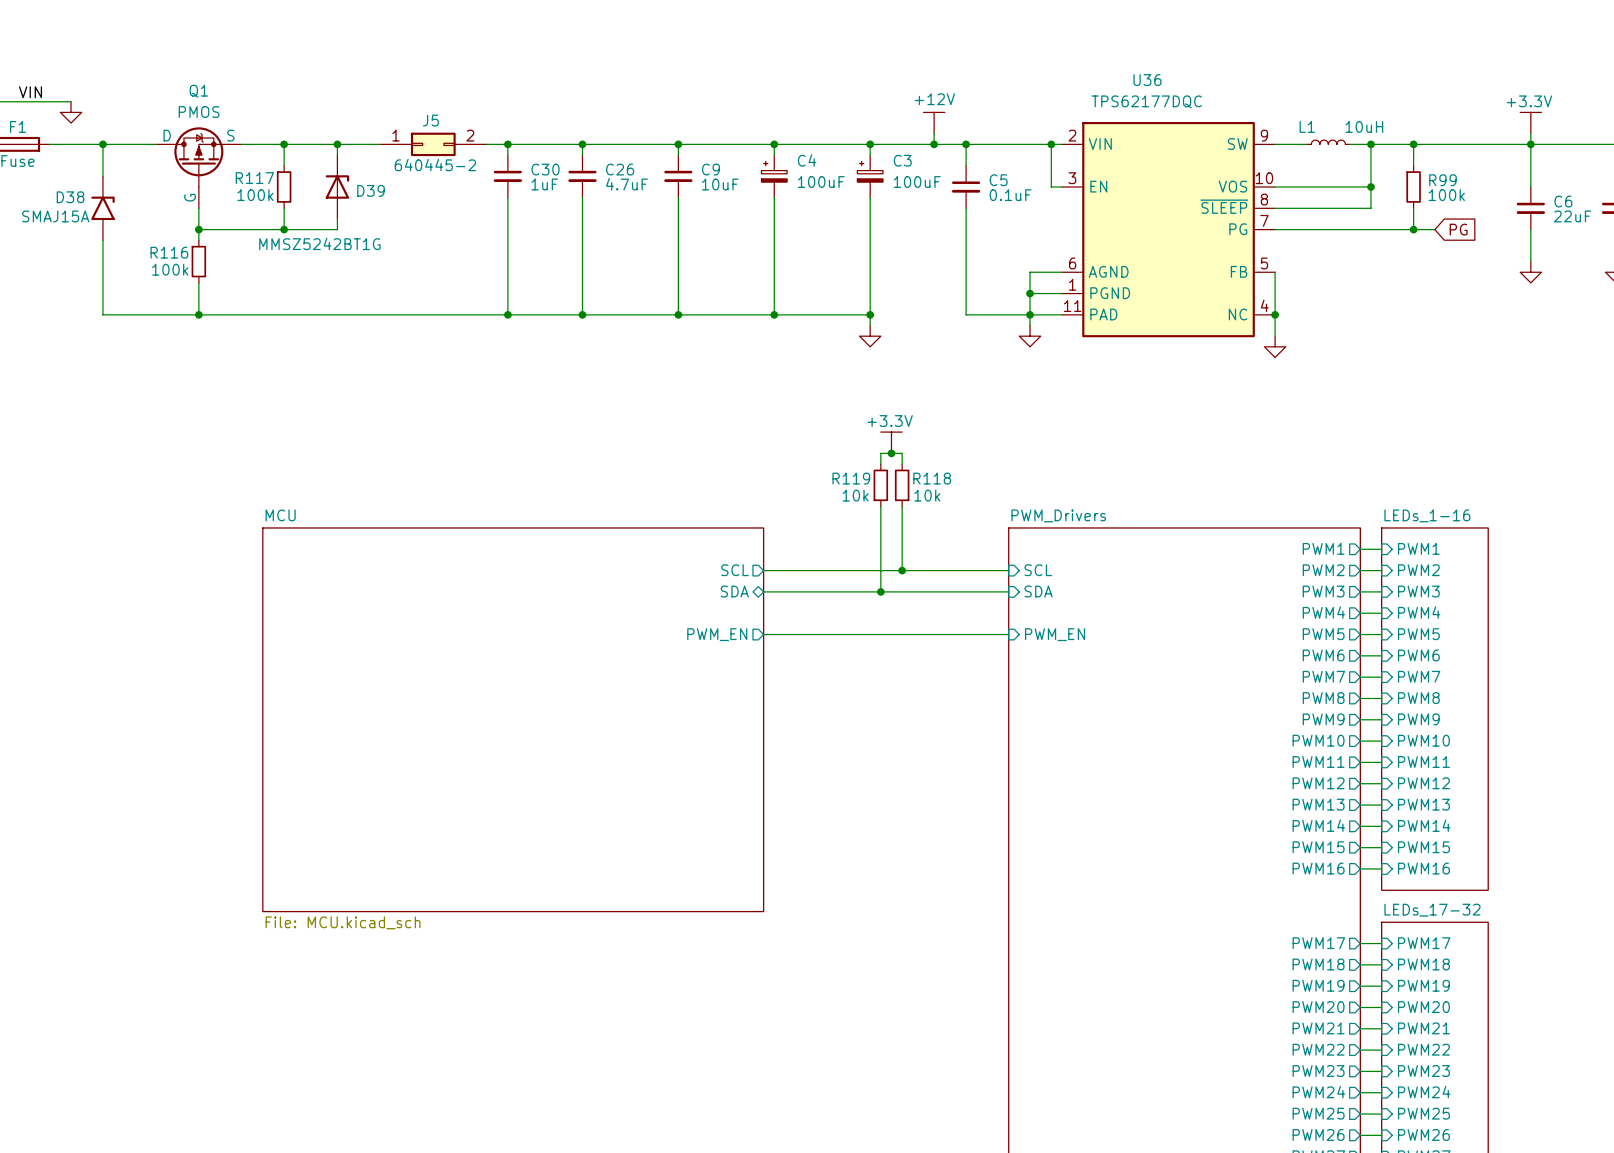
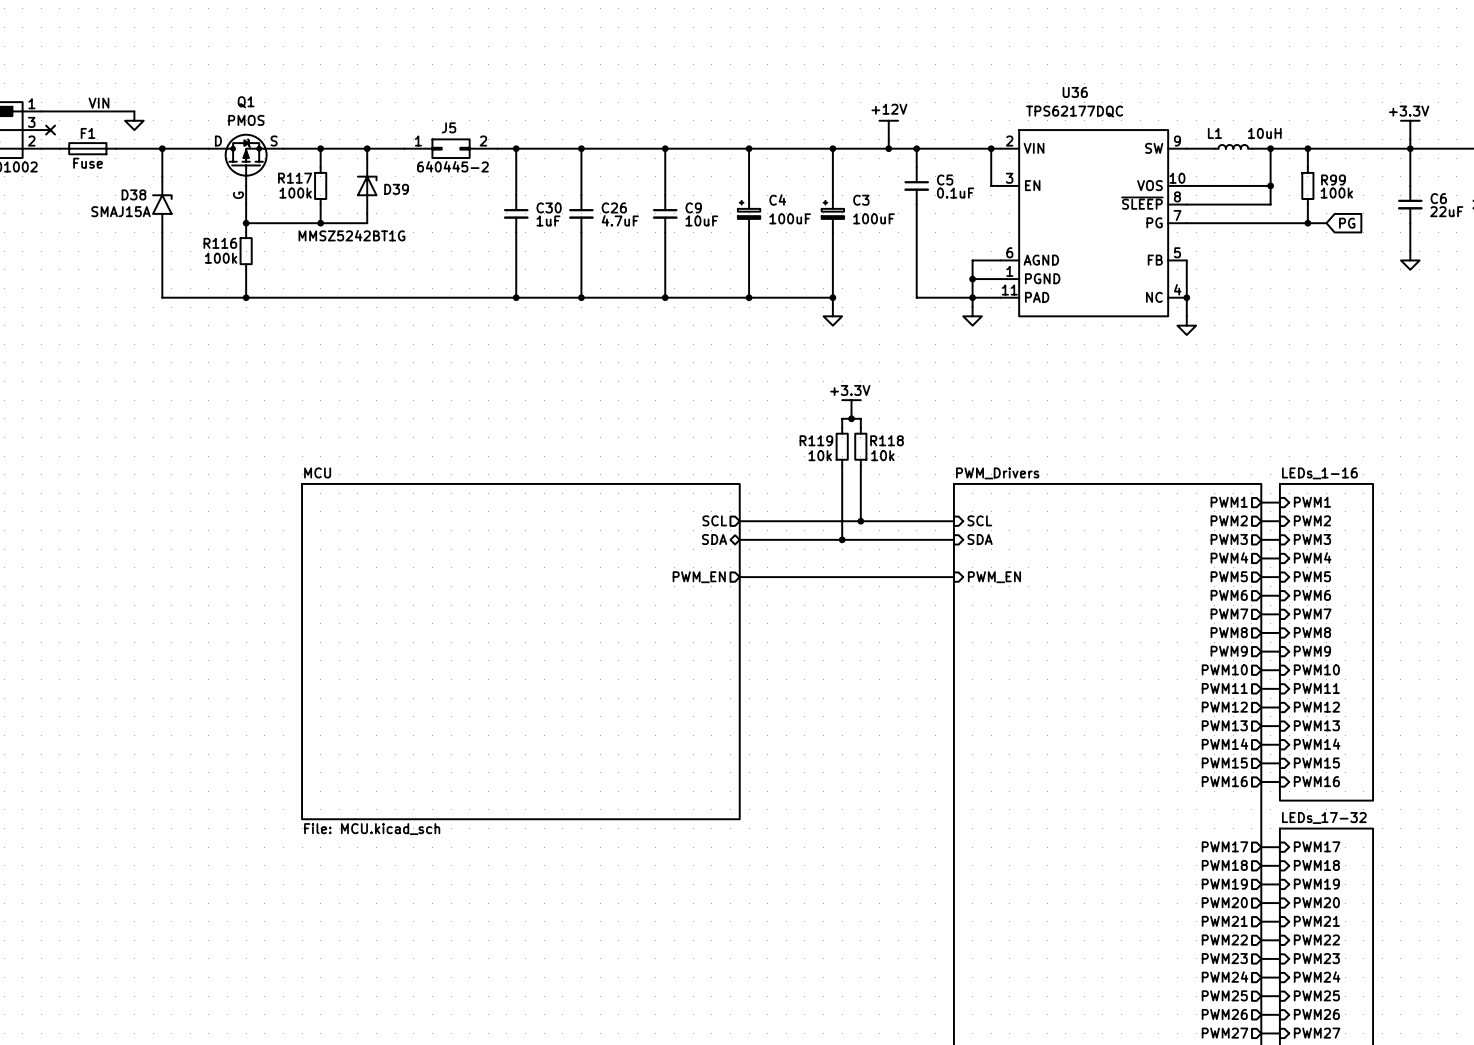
C30 position: (507, 176) -> (516, 213)
C26 position: (582, 176) -> (581, 213)
C9 position: (678, 176) -> (665, 213)
C4 position: (774, 176) -> (749, 213)
C3 position: (870, 176) -> (832, 213)

